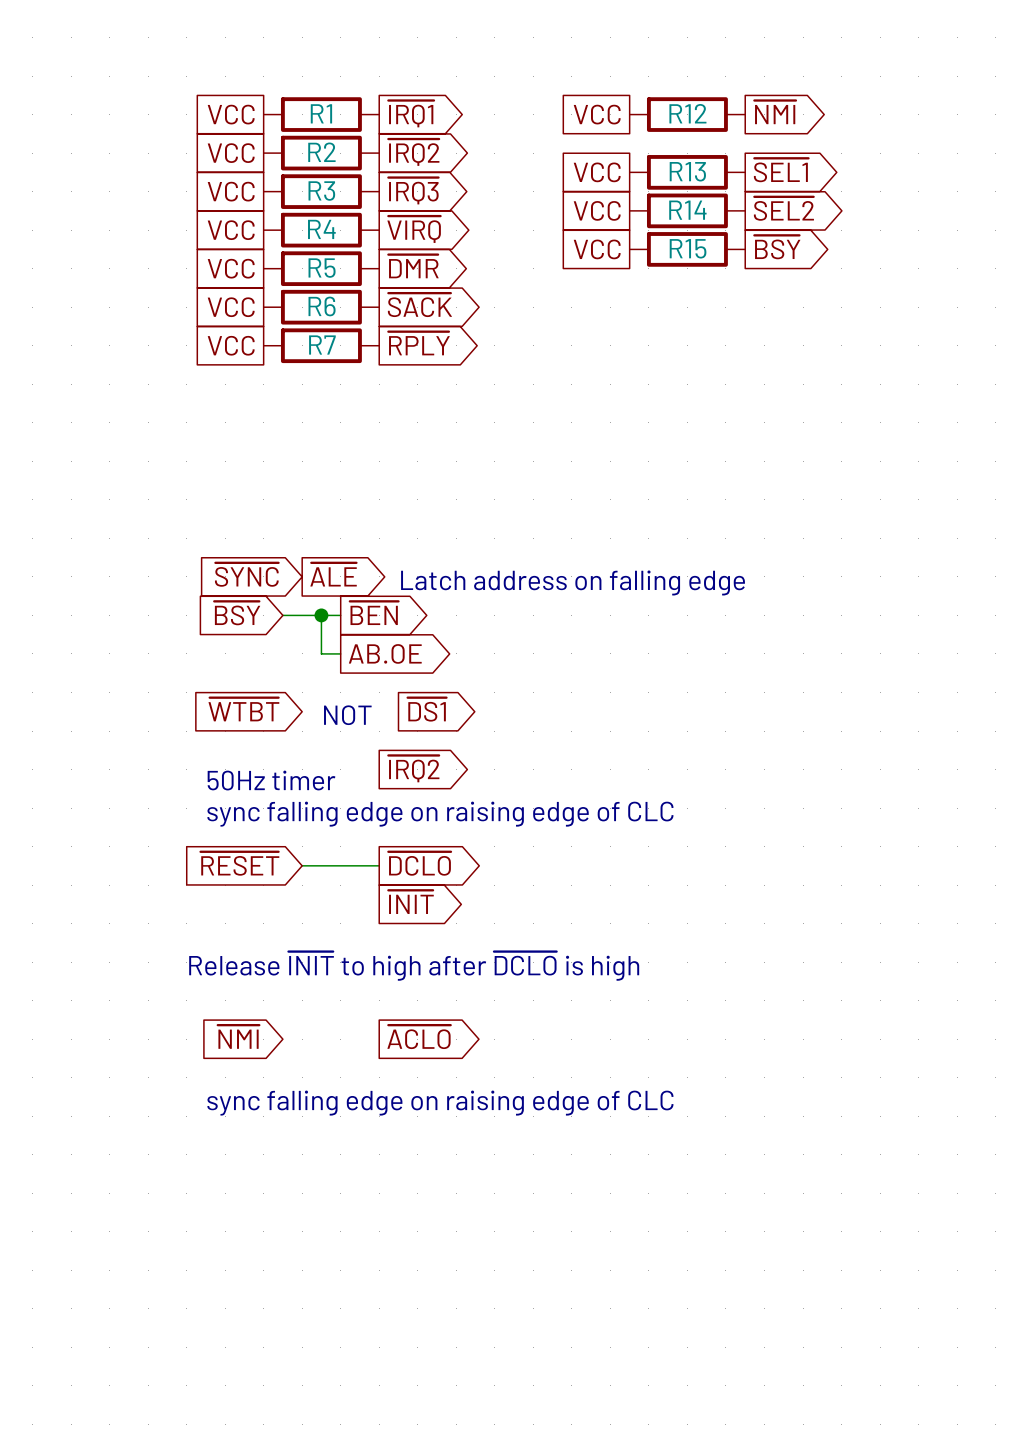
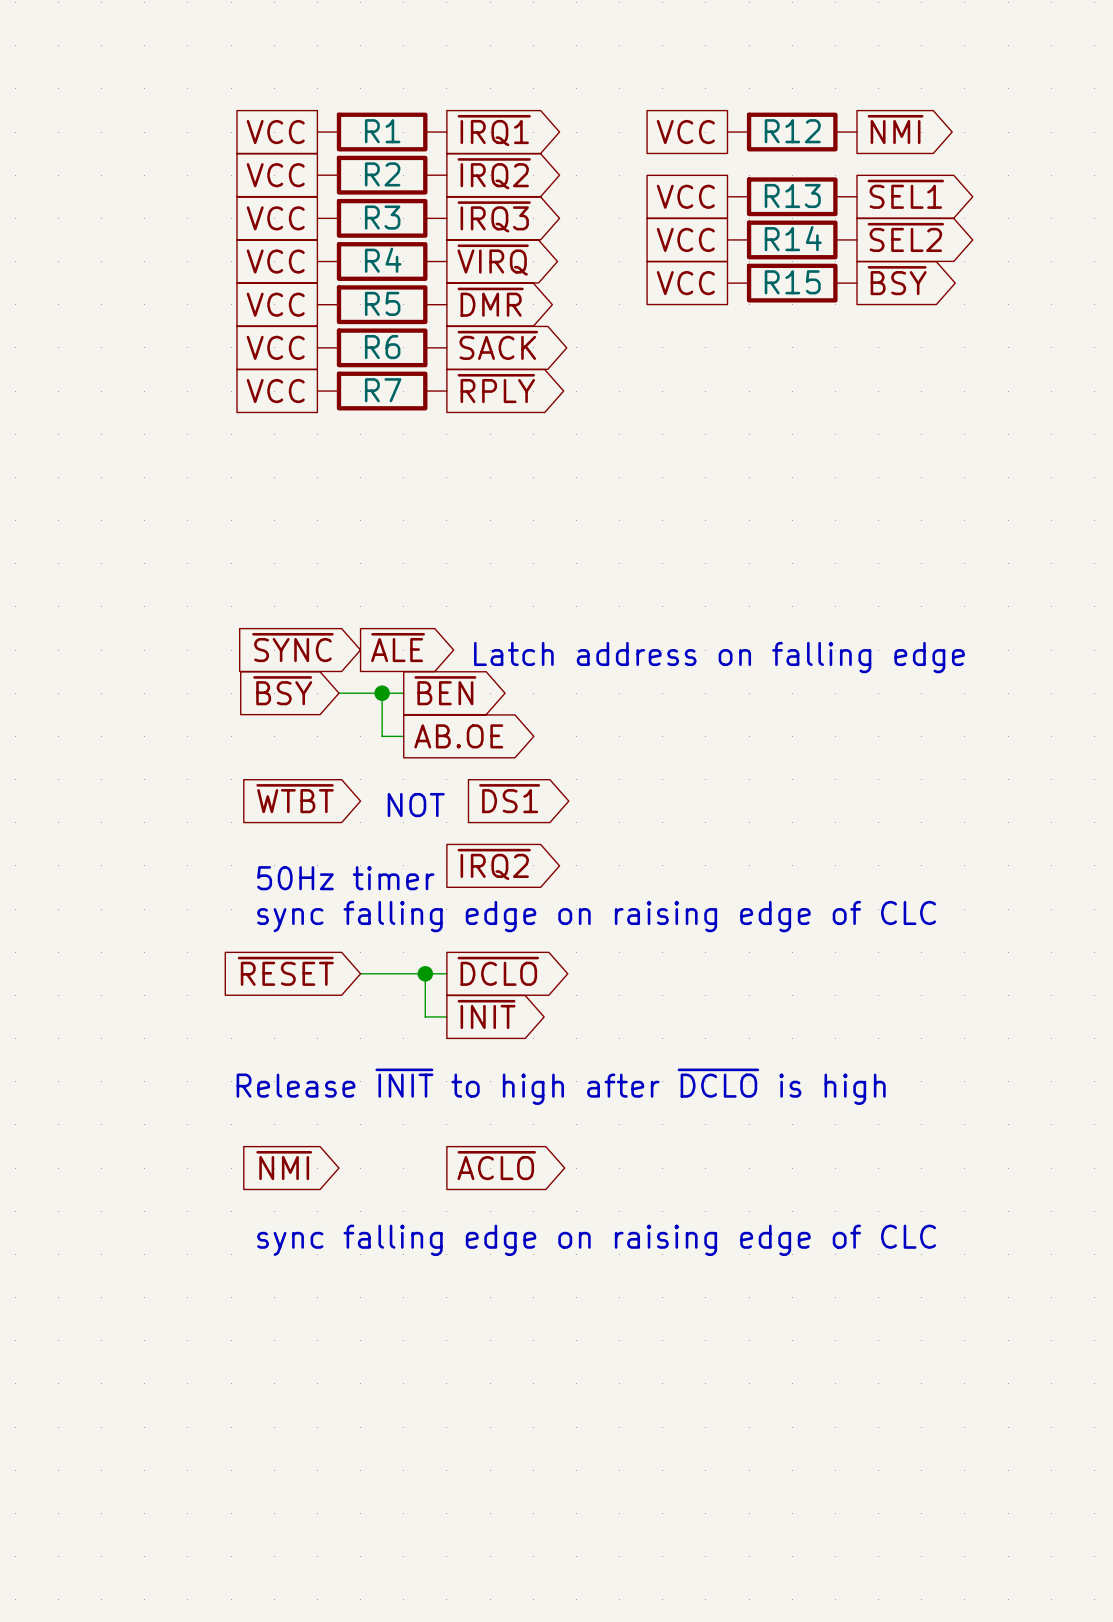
wire: none -> (425, 973) (425, 1016) (446, 1016)
junction: none -> (425, 973)

